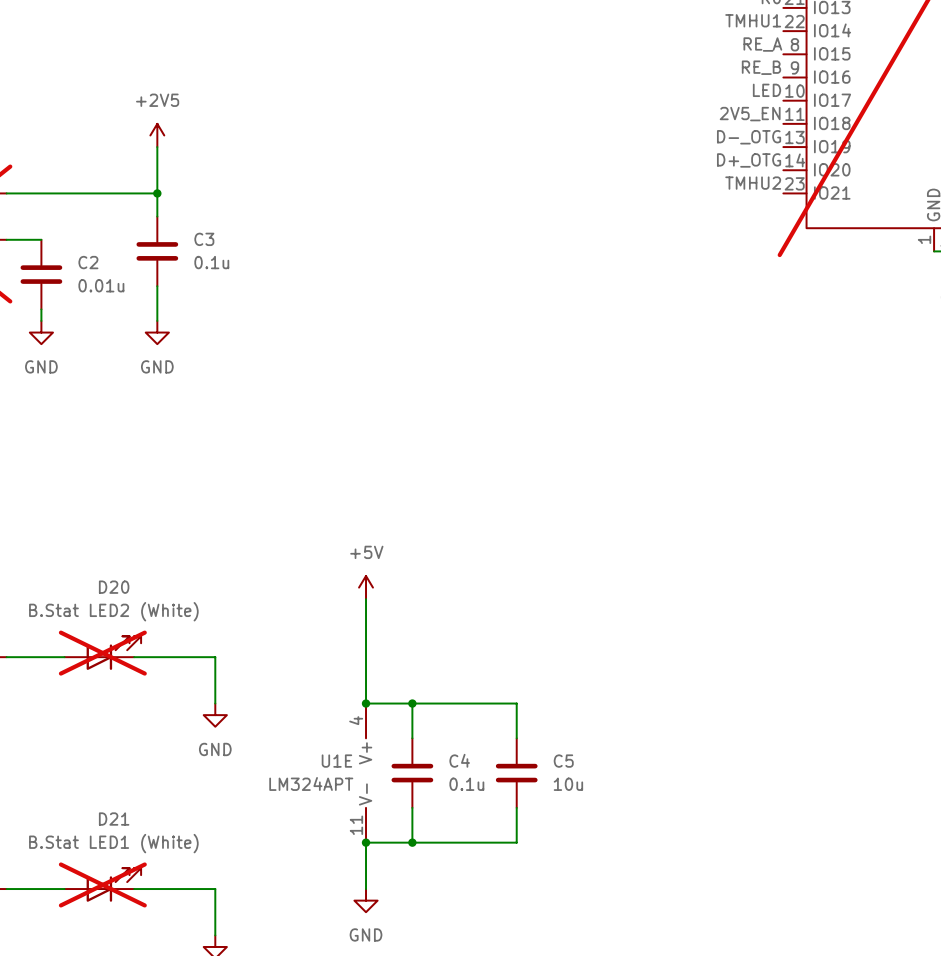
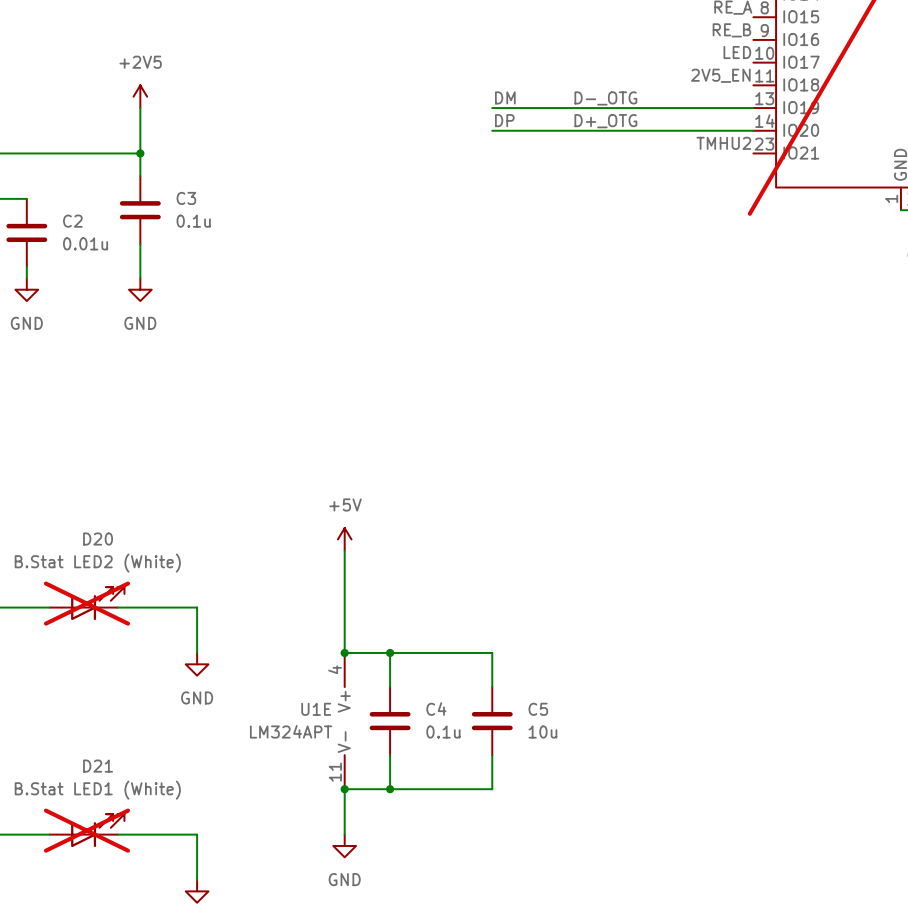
label: none -> DM (505, 97)
label position: D-_OTG (749, 137) -> D-_OTG (605, 98)
wire: none -> (492, 108) (753, 108)
label: none -> DP (504, 120)
label position: D+_OTG (749, 160) -> D+_OTG (605, 121)
wire: none -> (492, 130) (753, 130)

